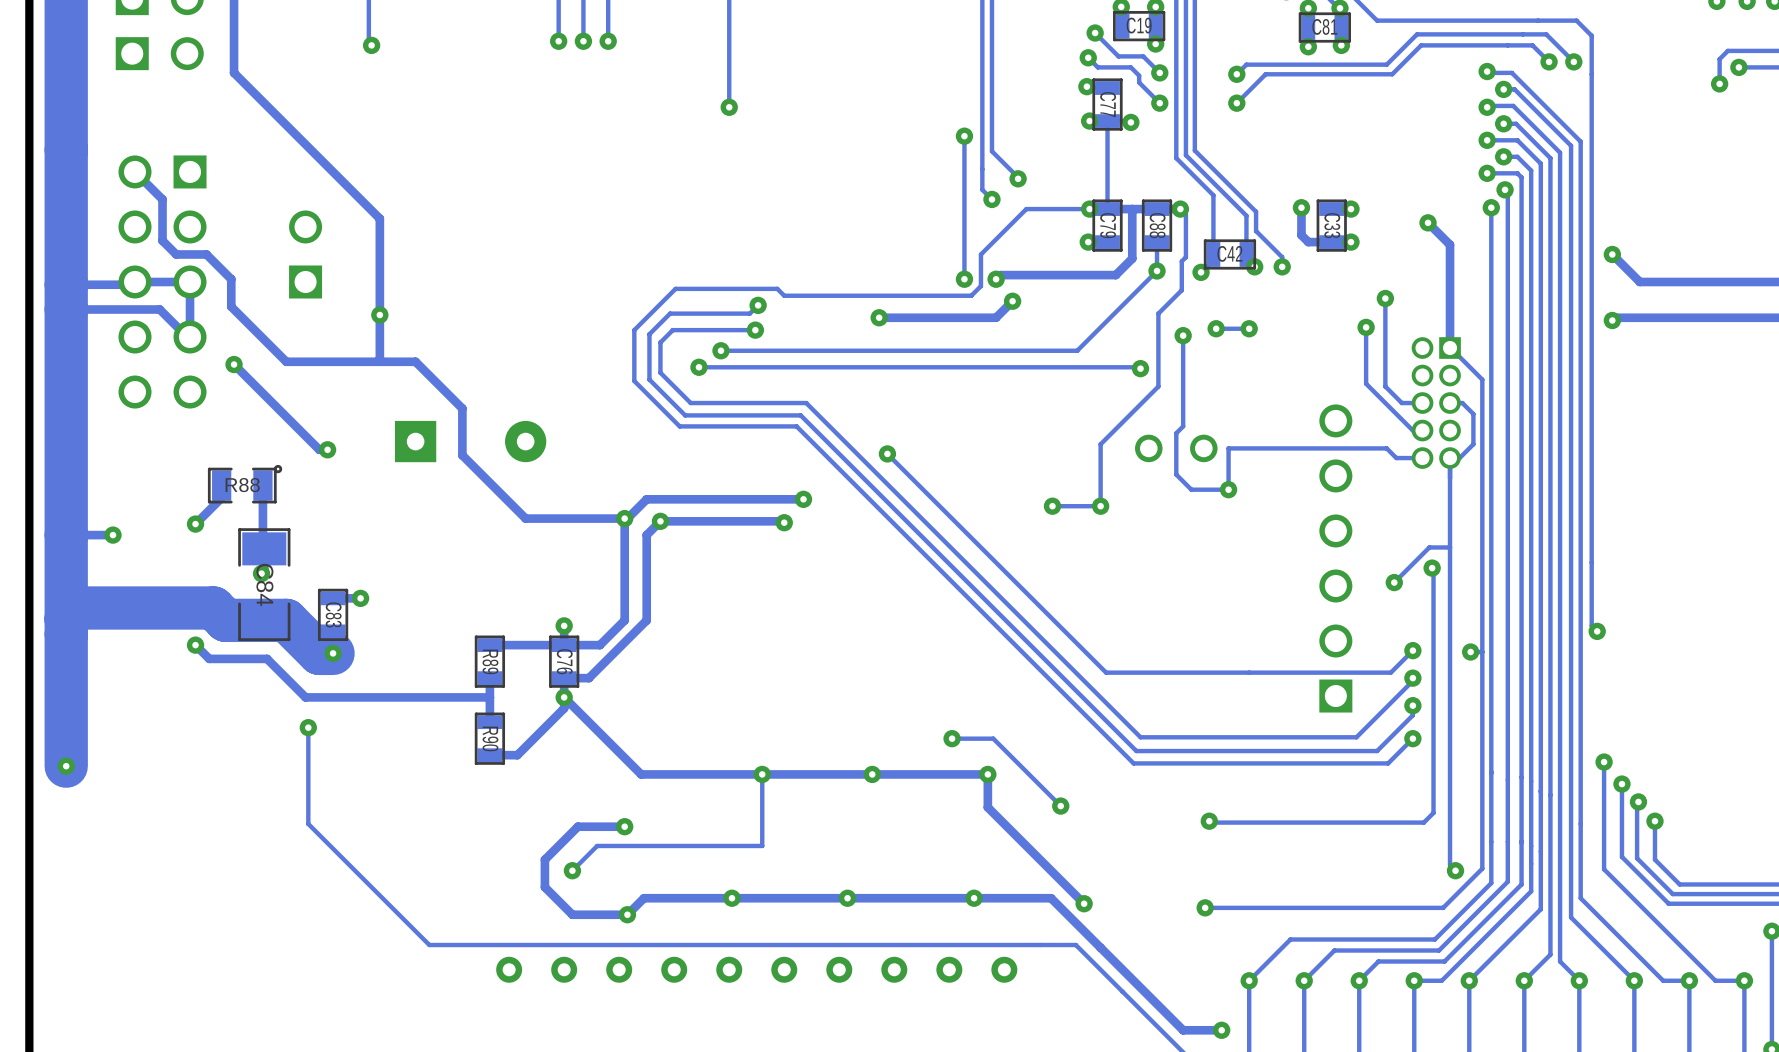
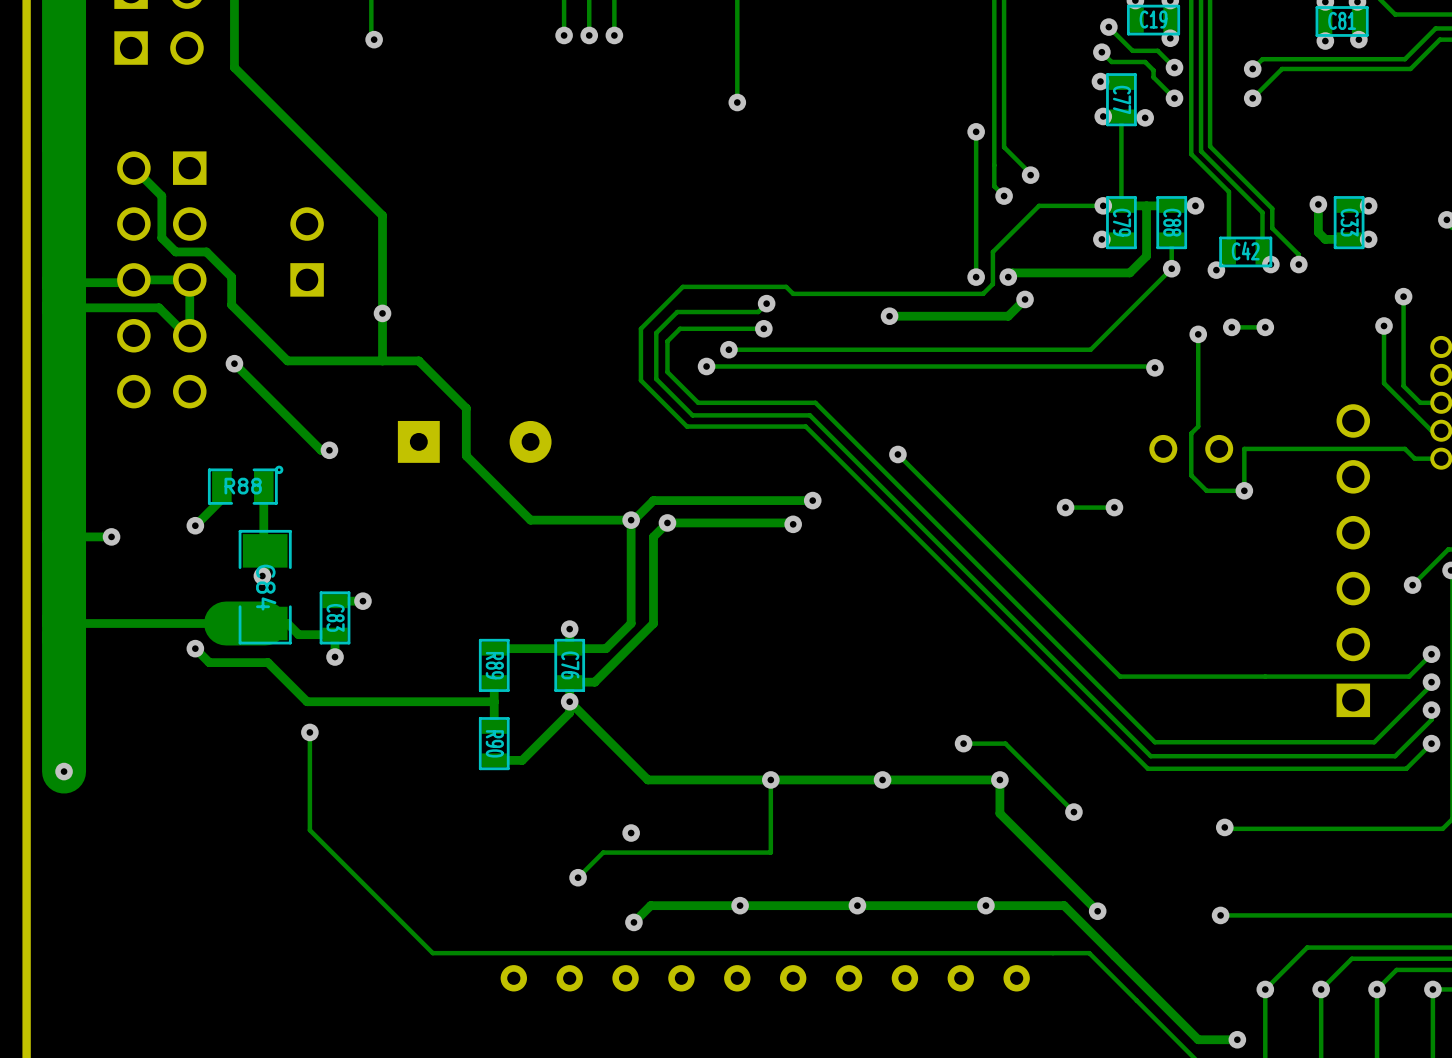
track: (1180, 209) (1185, 214) (1185, 257) (1181, 261) (1181, 290) (1158, 313) (1158, 386) (1100, 444) (1100, 506) -> none
track: (225, 620) (213, 607) (78, 607) (66, 620) -> (226, 623) (64, 623)
track: (264, 620) (286, 620) (319, 653) (333, 653) -> none
track: (624, 826) (577, 826) (544, 859) (544, 887) (572, 914) (627, 914) -> none

